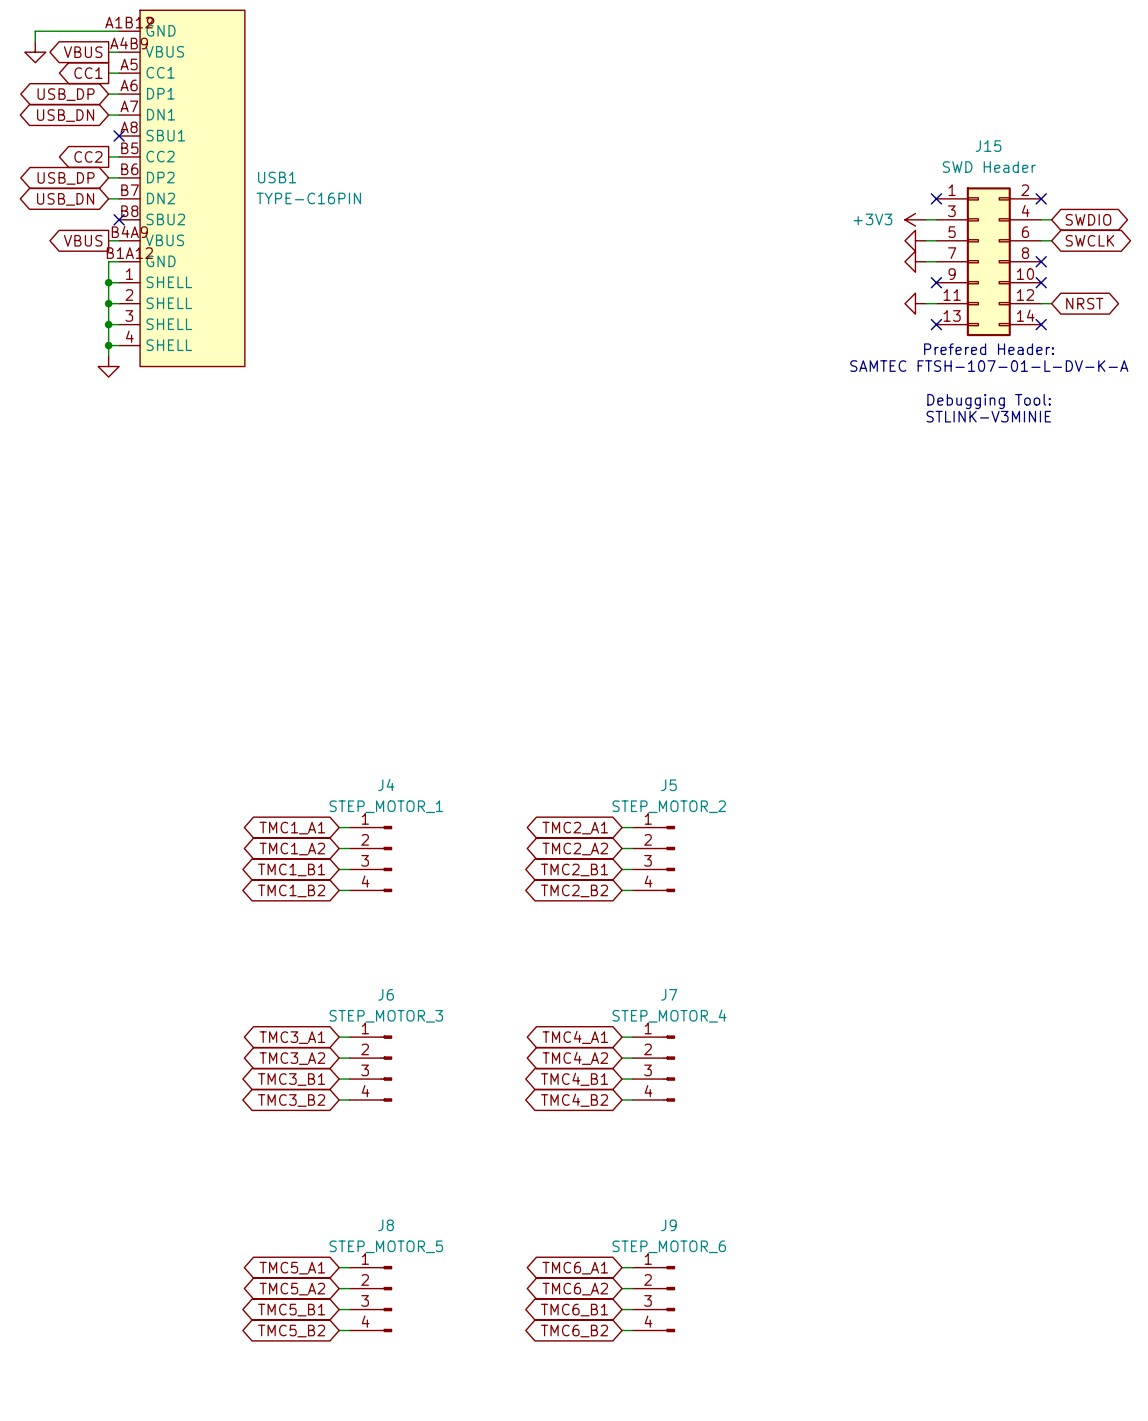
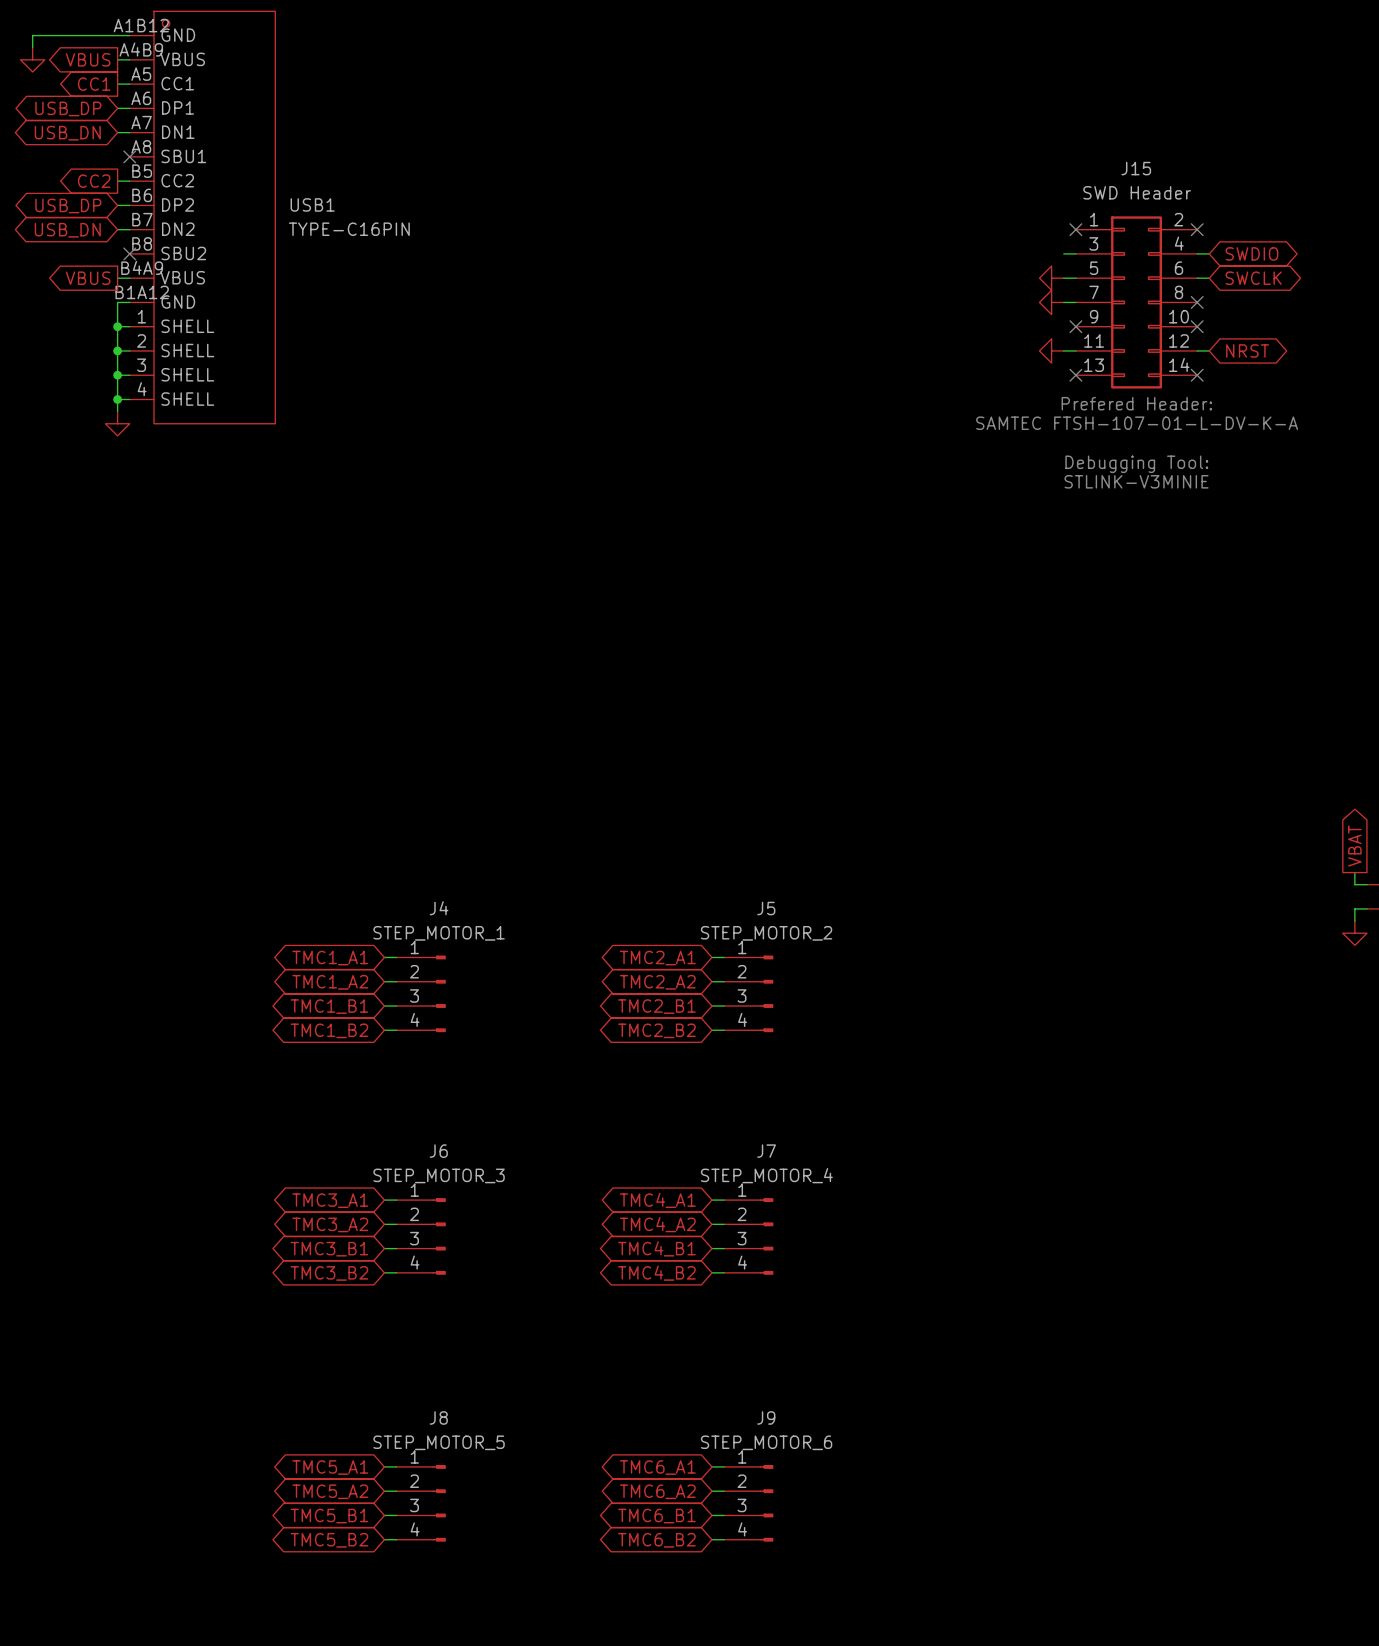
power symbol: +3V3 (915, 219) -> none

